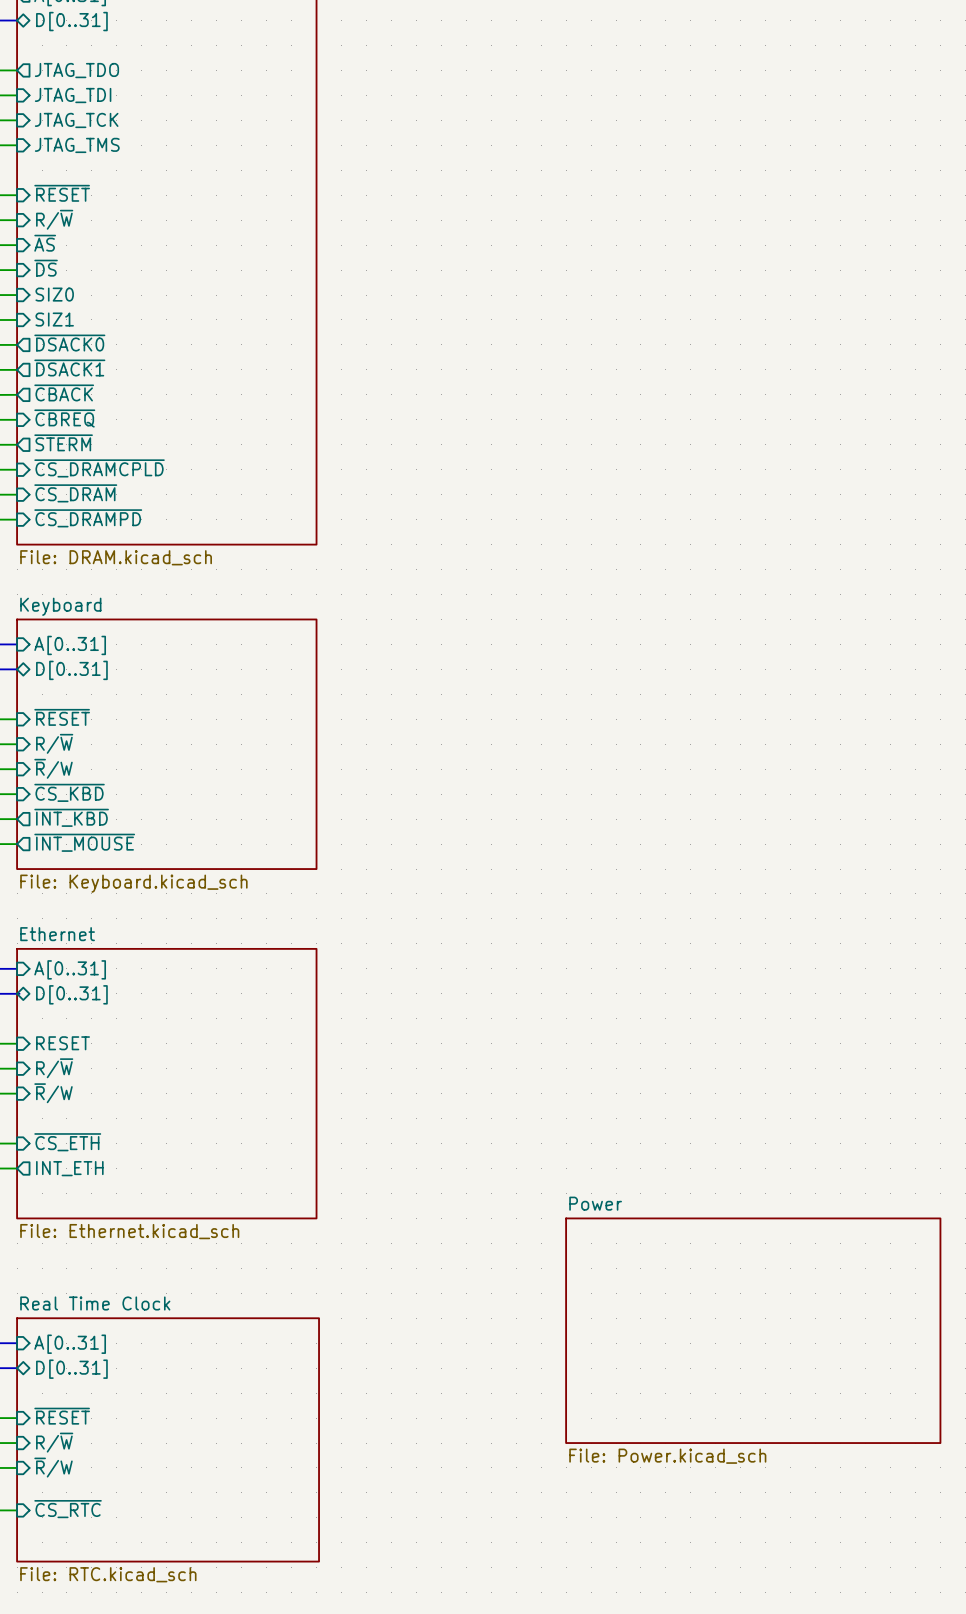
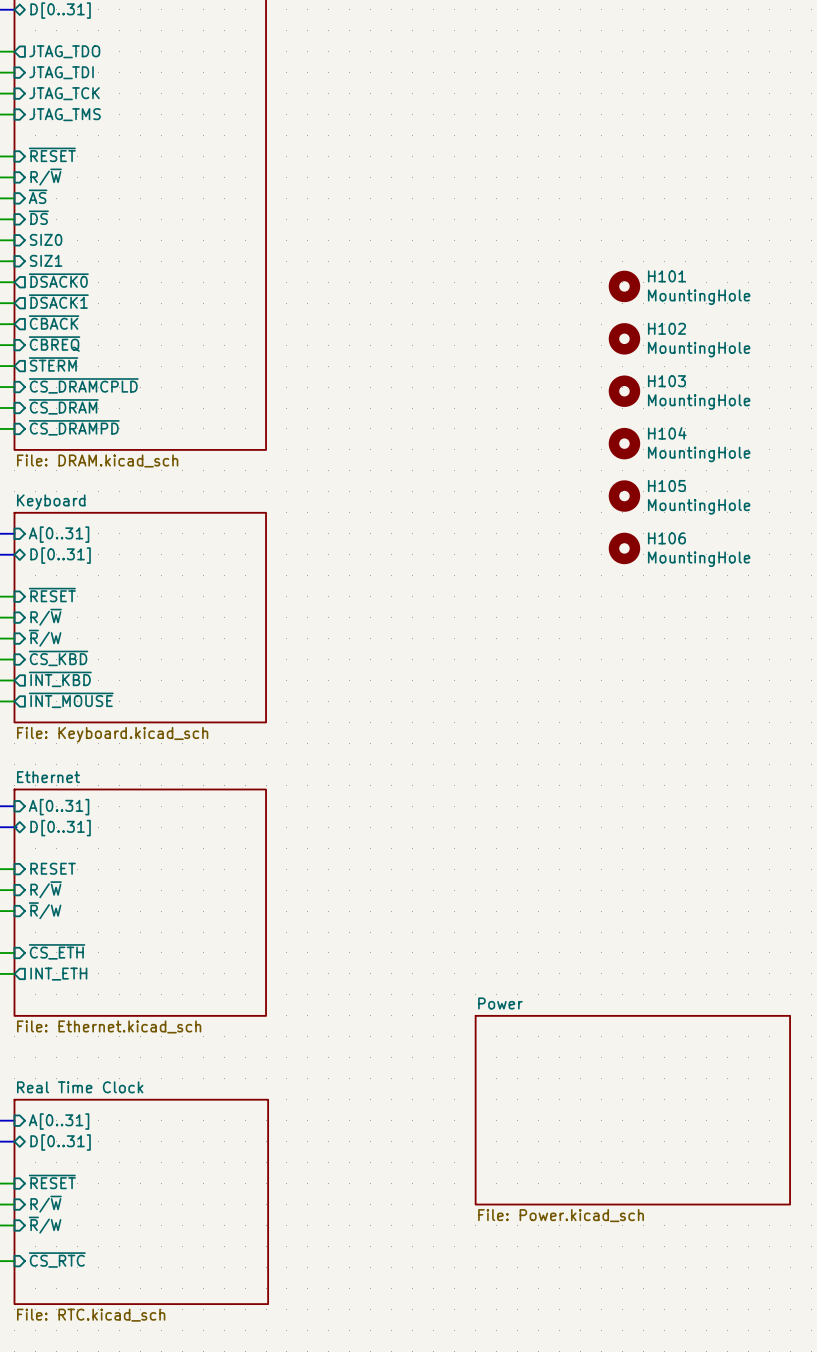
H101: none -> MountingHole (624, 286)
H102: none -> MountingHole (624, 338)
H103: none -> MountingHole (624, 391)
H104: none -> MountingHole (624, 443)
H105: none -> MountingHole (624, 496)
H106: none -> MountingHole (624, 548)

